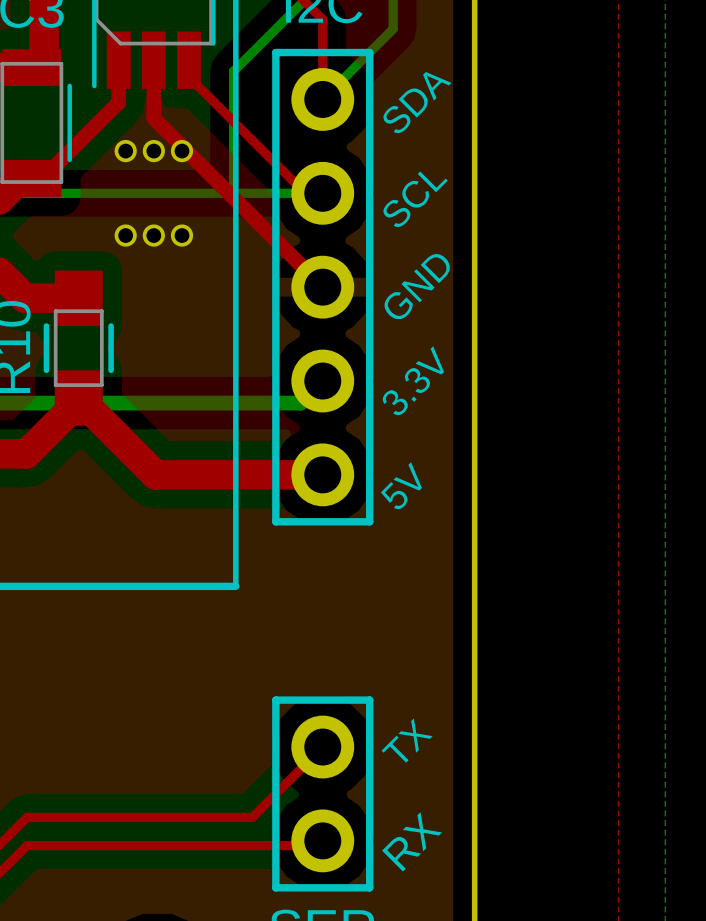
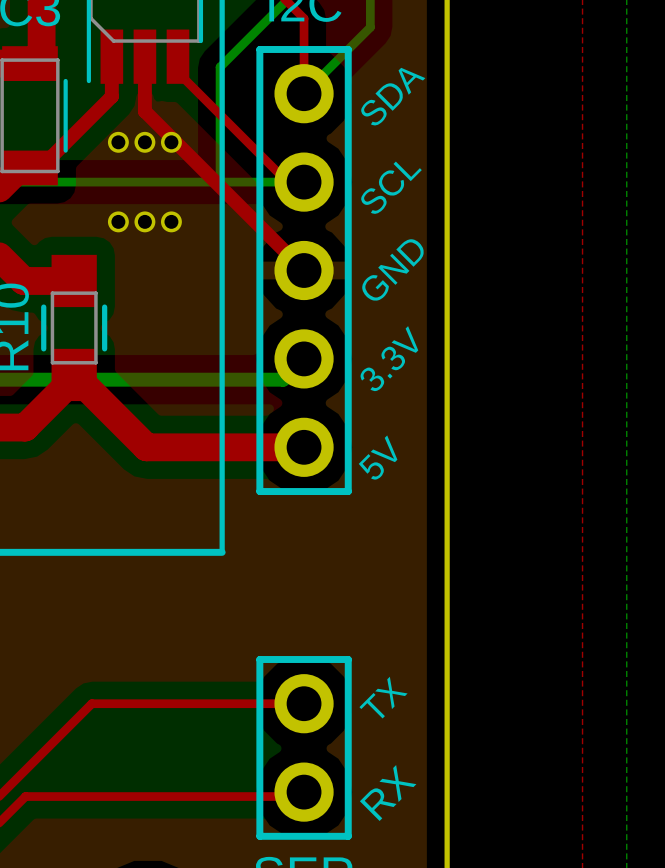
top track: (322, 747) (252, 817) (27, 817) -> (304, 703) (91, 703) (25, 770)

